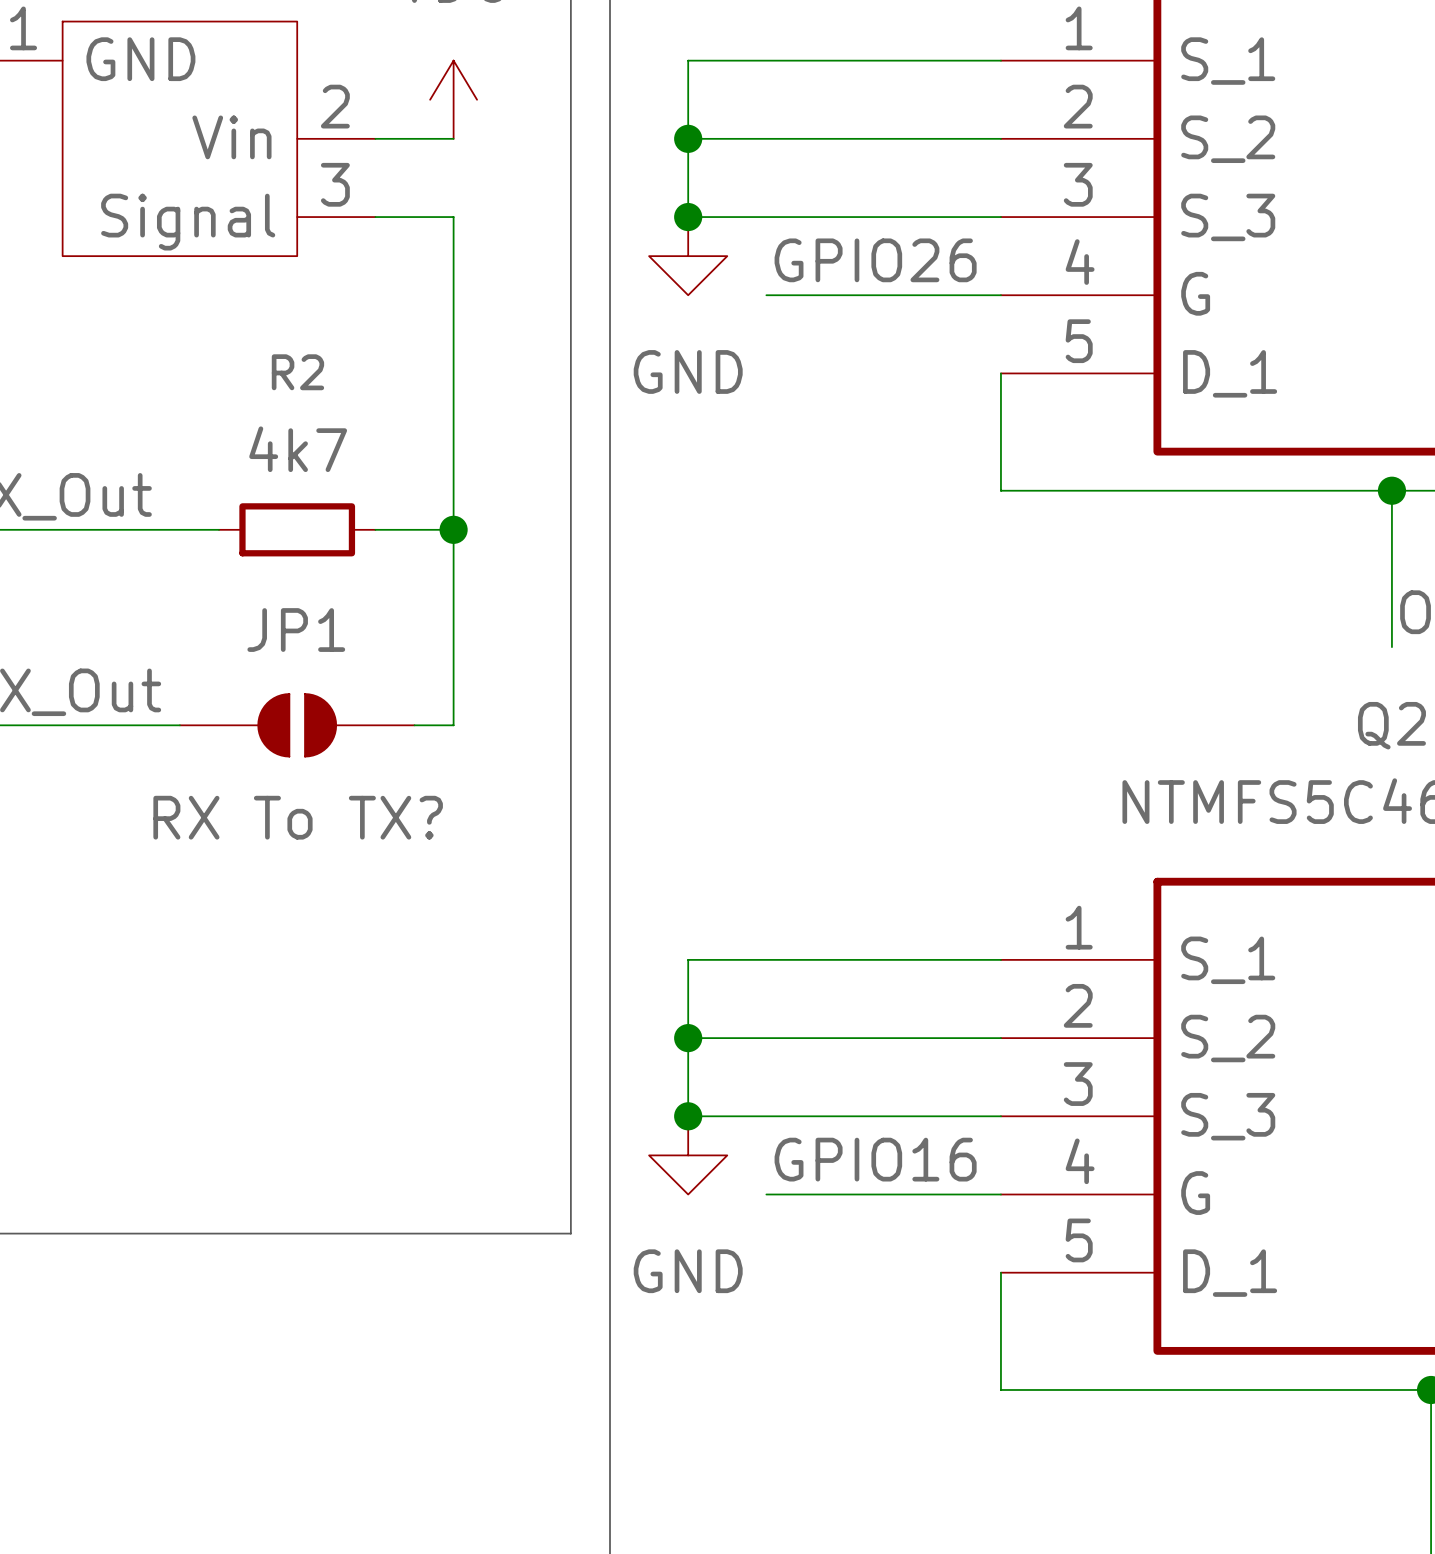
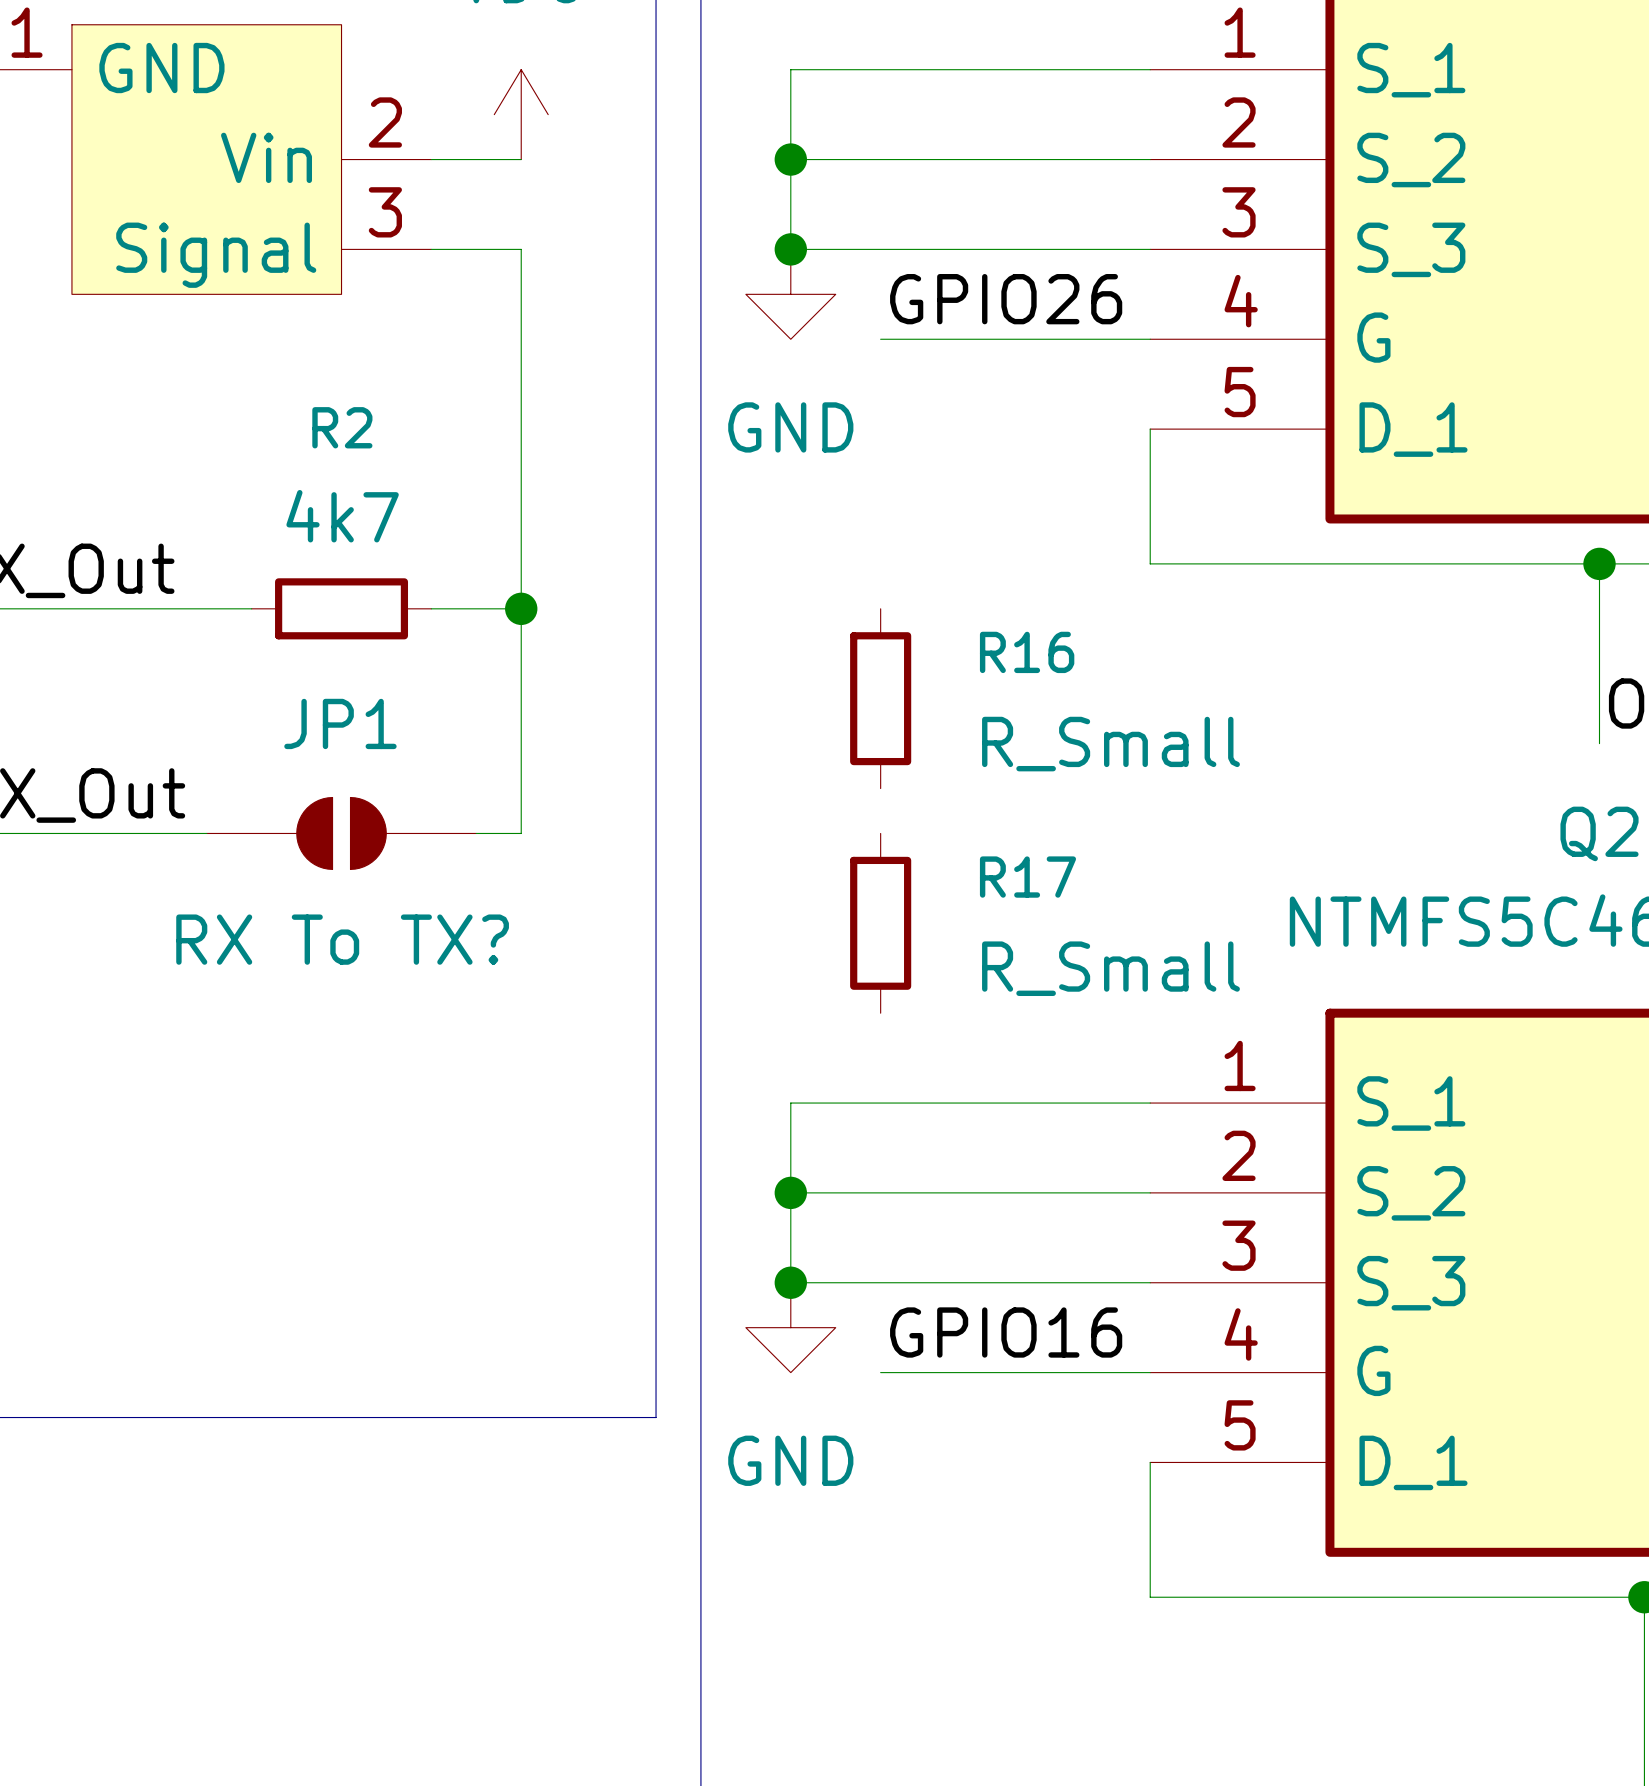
R16: none -> R_Small (880, 698)
R17: none -> R_Small (880, 923)

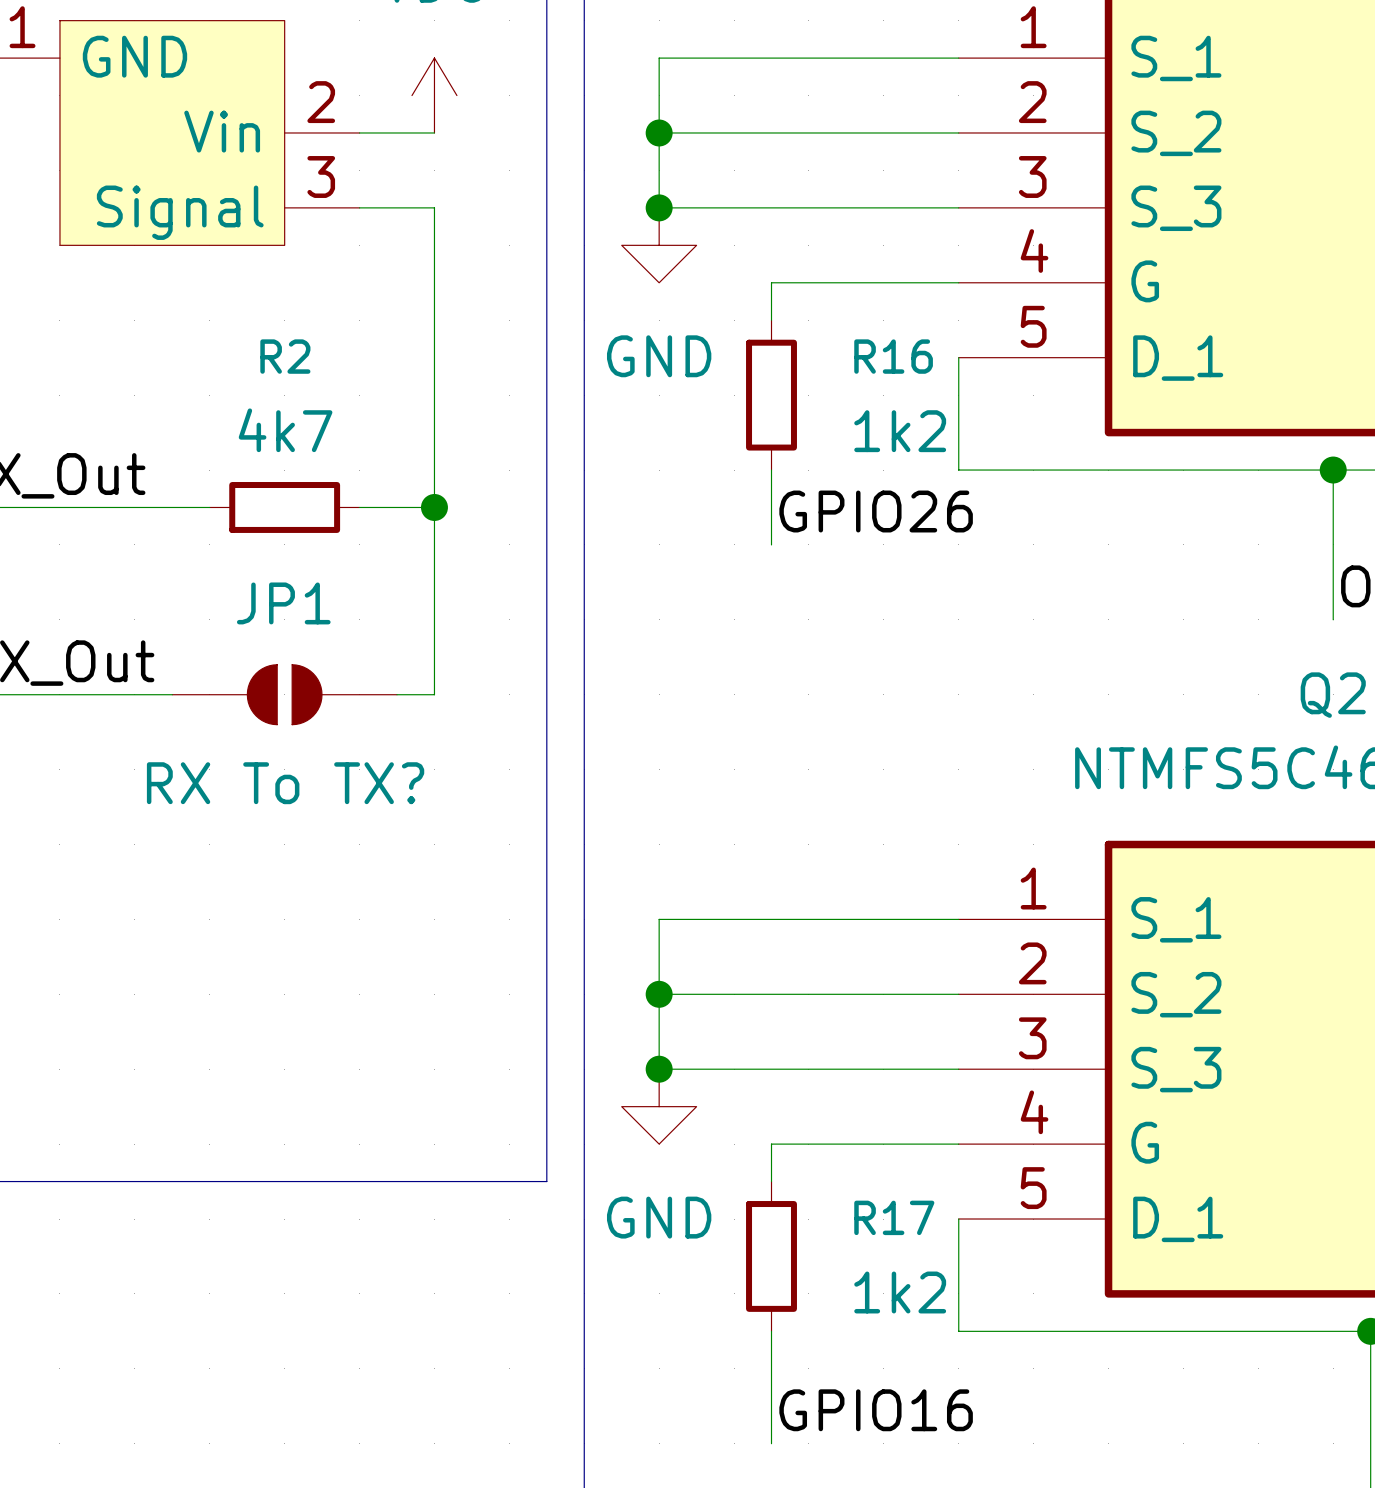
label position: GPIO26 (1006, 299) -> GPIO26 (876, 511)
wire: (880, 339) (925, 339) -> (771, 320) (771, 282)
wire: none -> (771, 470) (771, 544)
R16 position: (880, 698) -> (771, 395)
R16 value: R_Small (1110, 744) -> 1k2 (900, 431)
R17 position: (880, 923) -> (771, 1256)
R17 value: R_Small (1110, 968) -> 1k2 (900, 1292)
label position: GPIO16 (1006, 1332) -> GPIO16 (876, 1410)
wire: (880, 1372) (925, 1372) -> (771, 1181) (771, 1144)
wire: none -> (771, 1331) (771, 1443)

